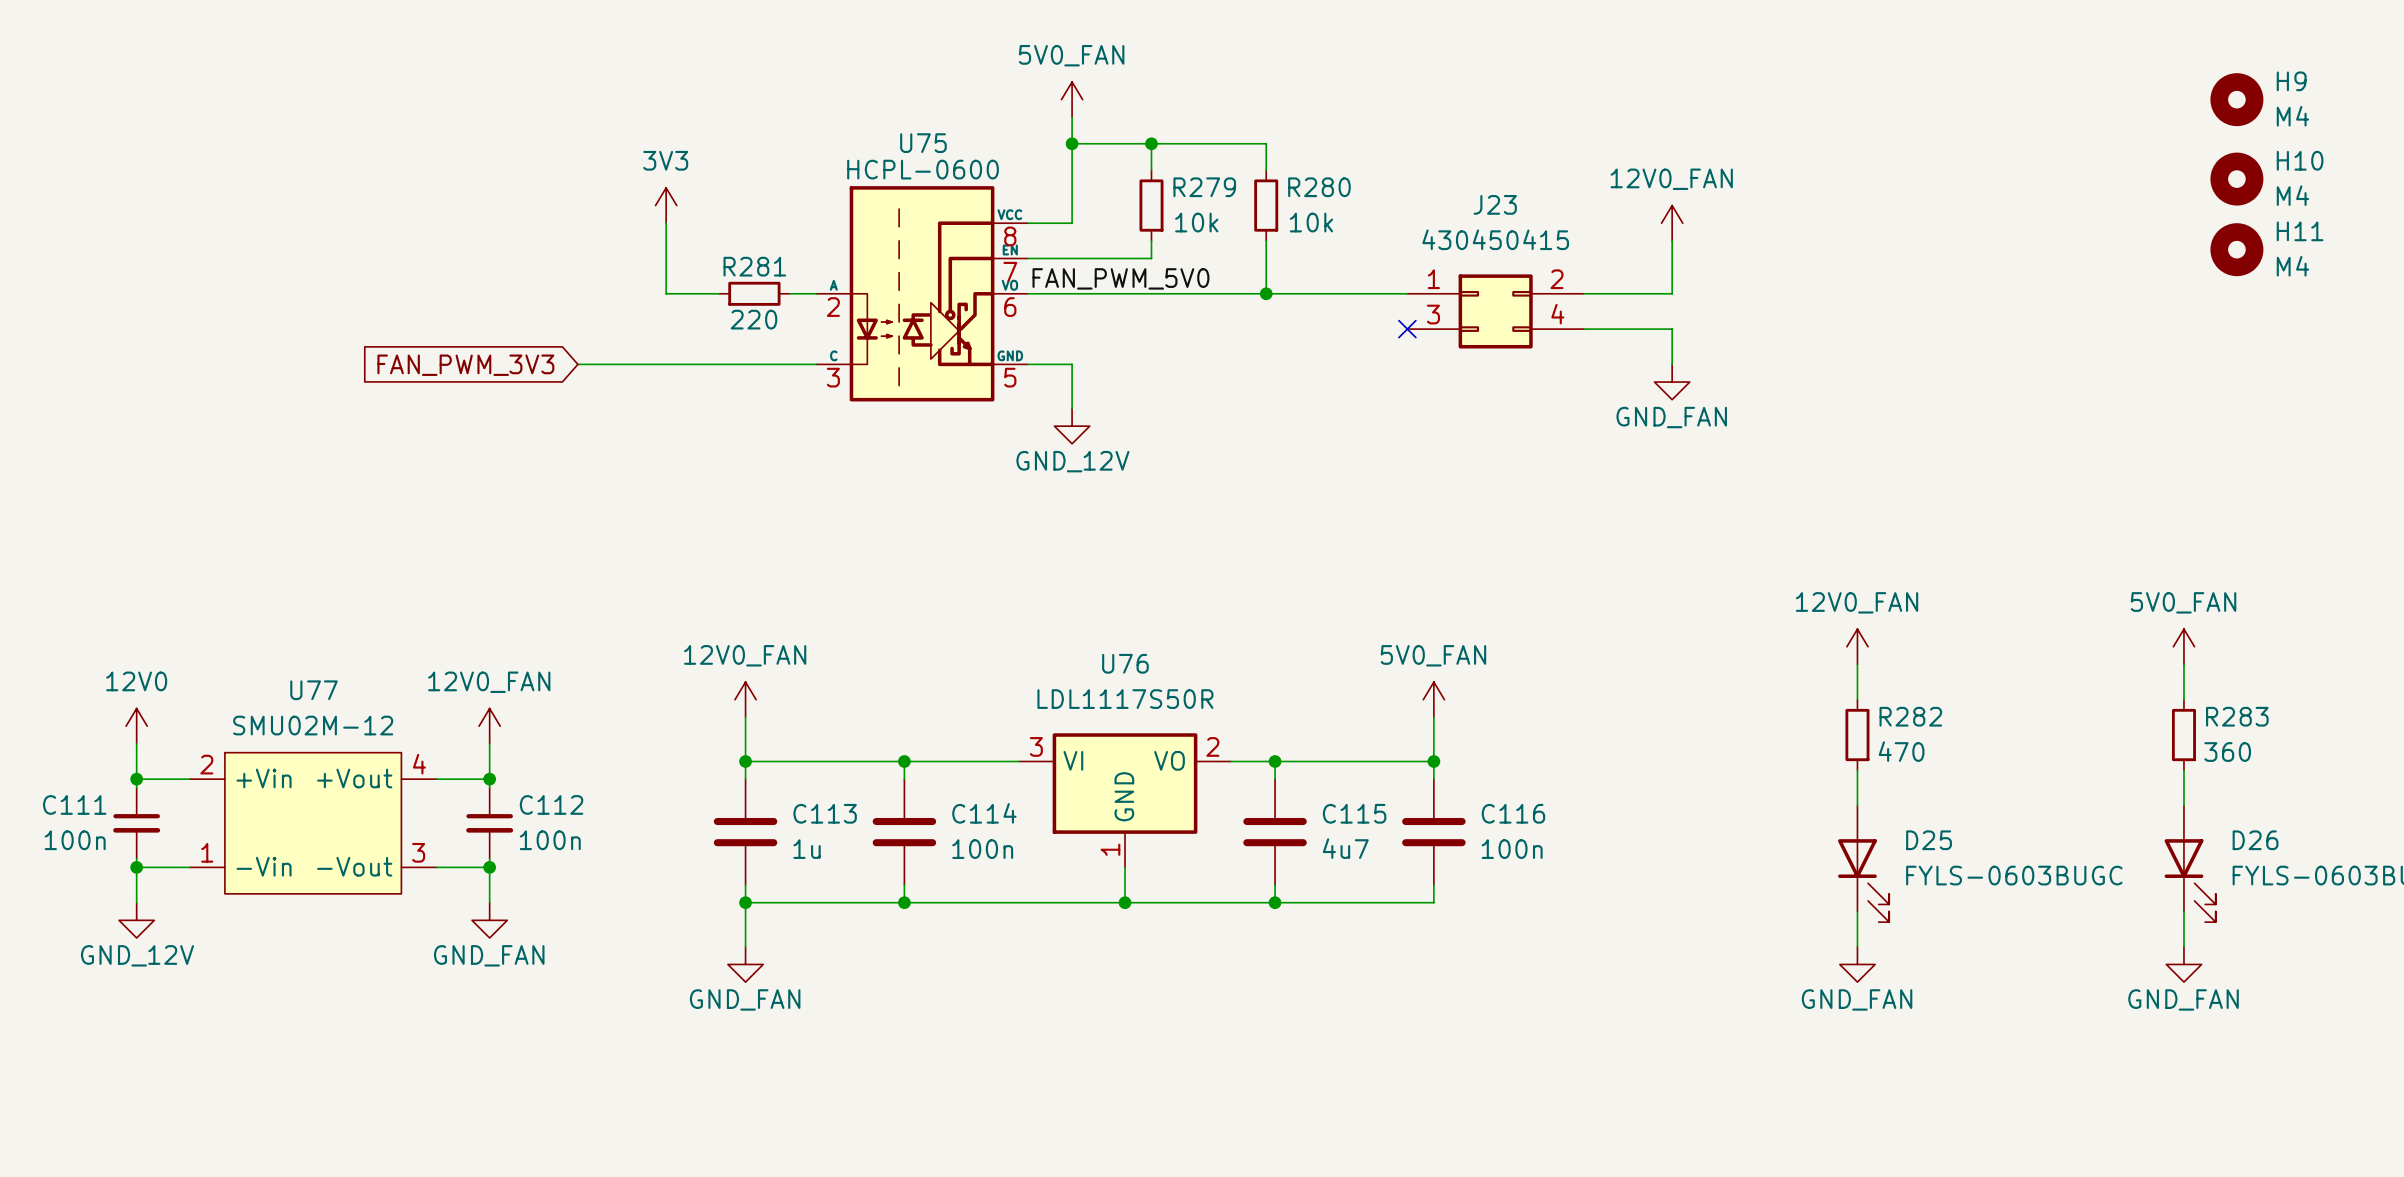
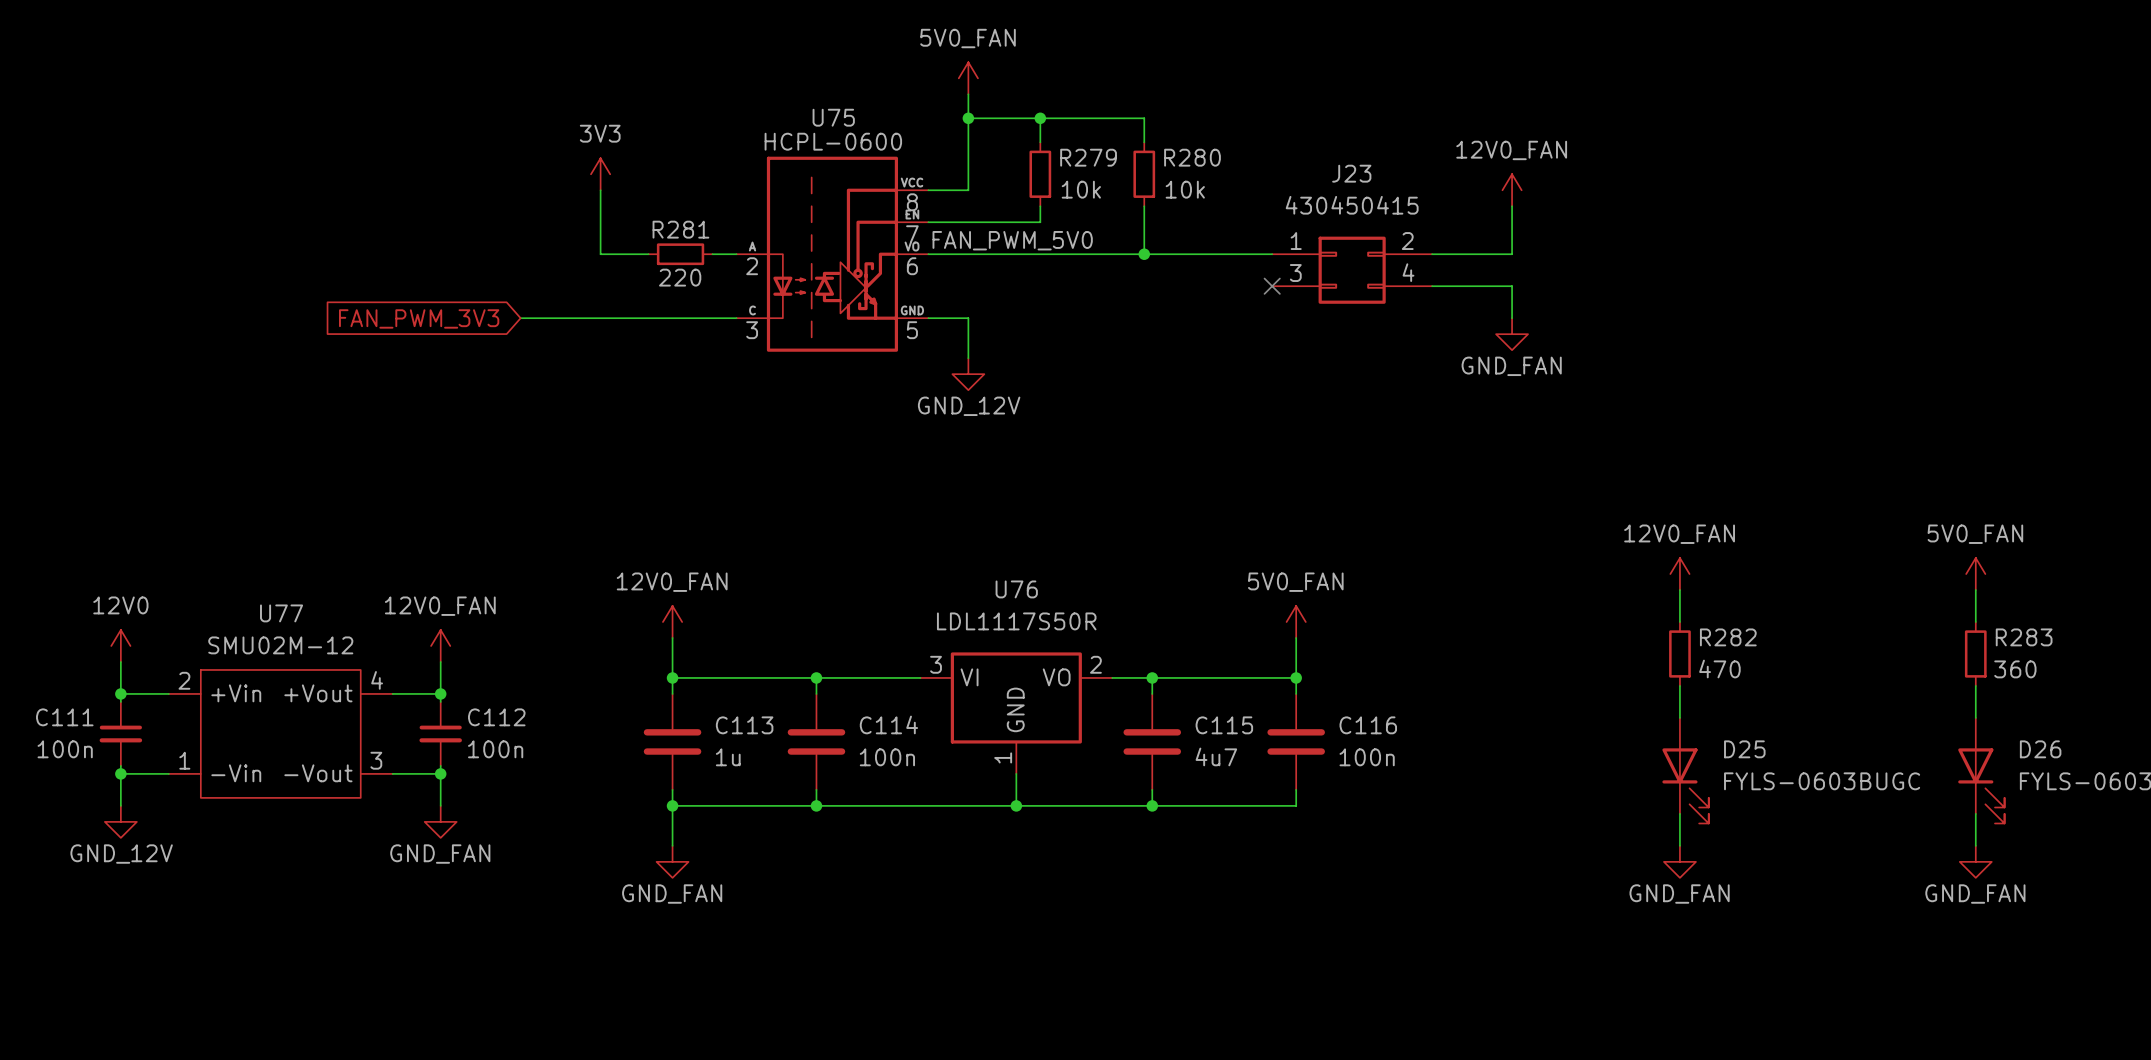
H9: M4 (2236, 99) -> none
H10: M4 (2236, 179) -> none
H11: M4 (2236, 249) -> none

